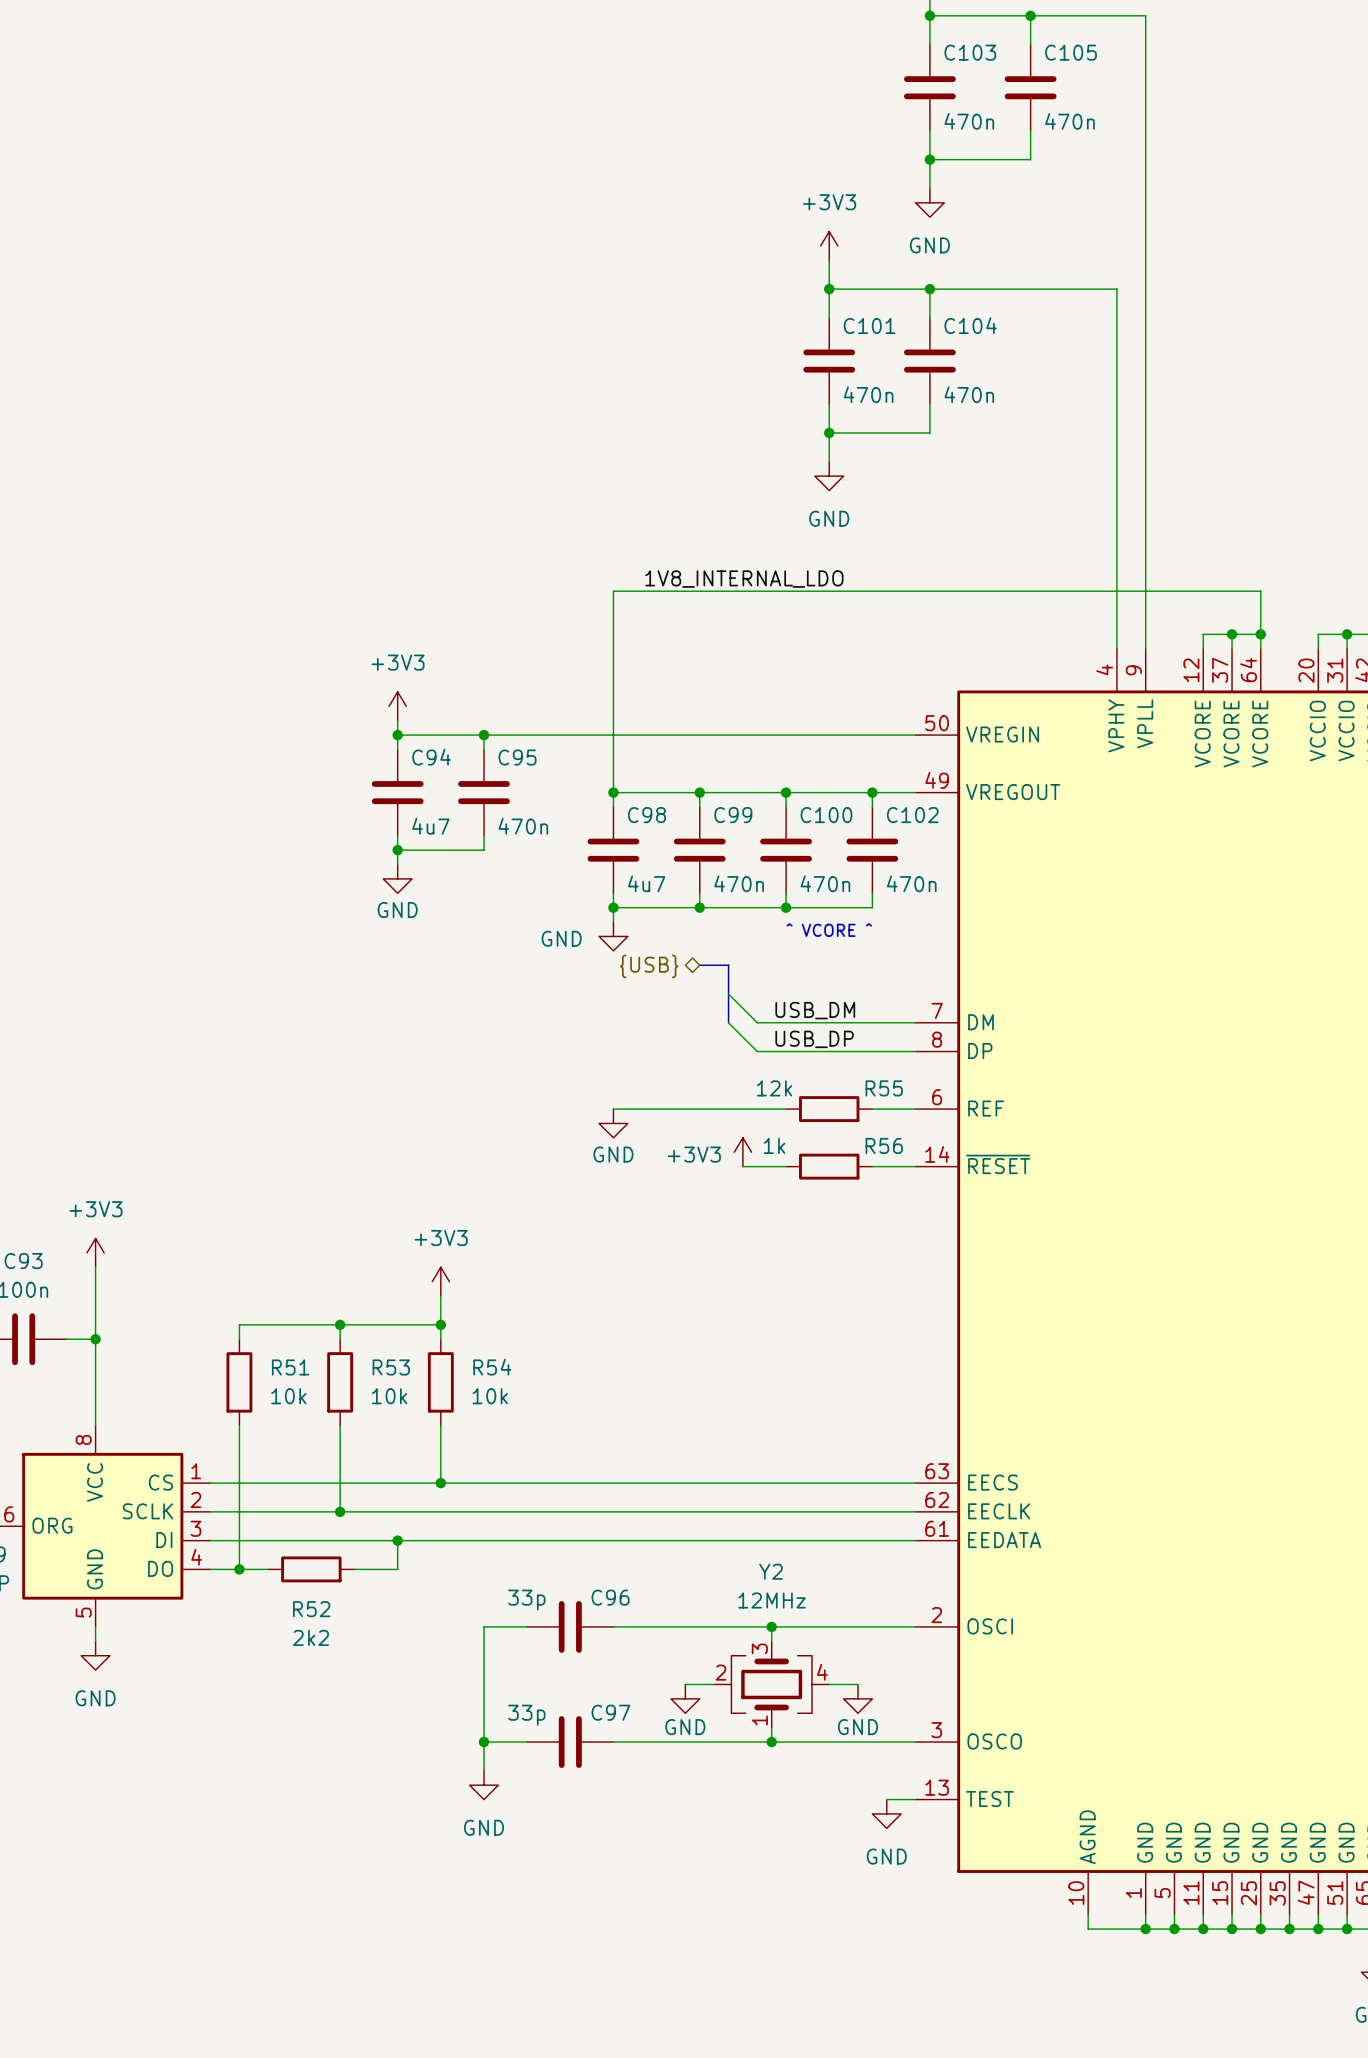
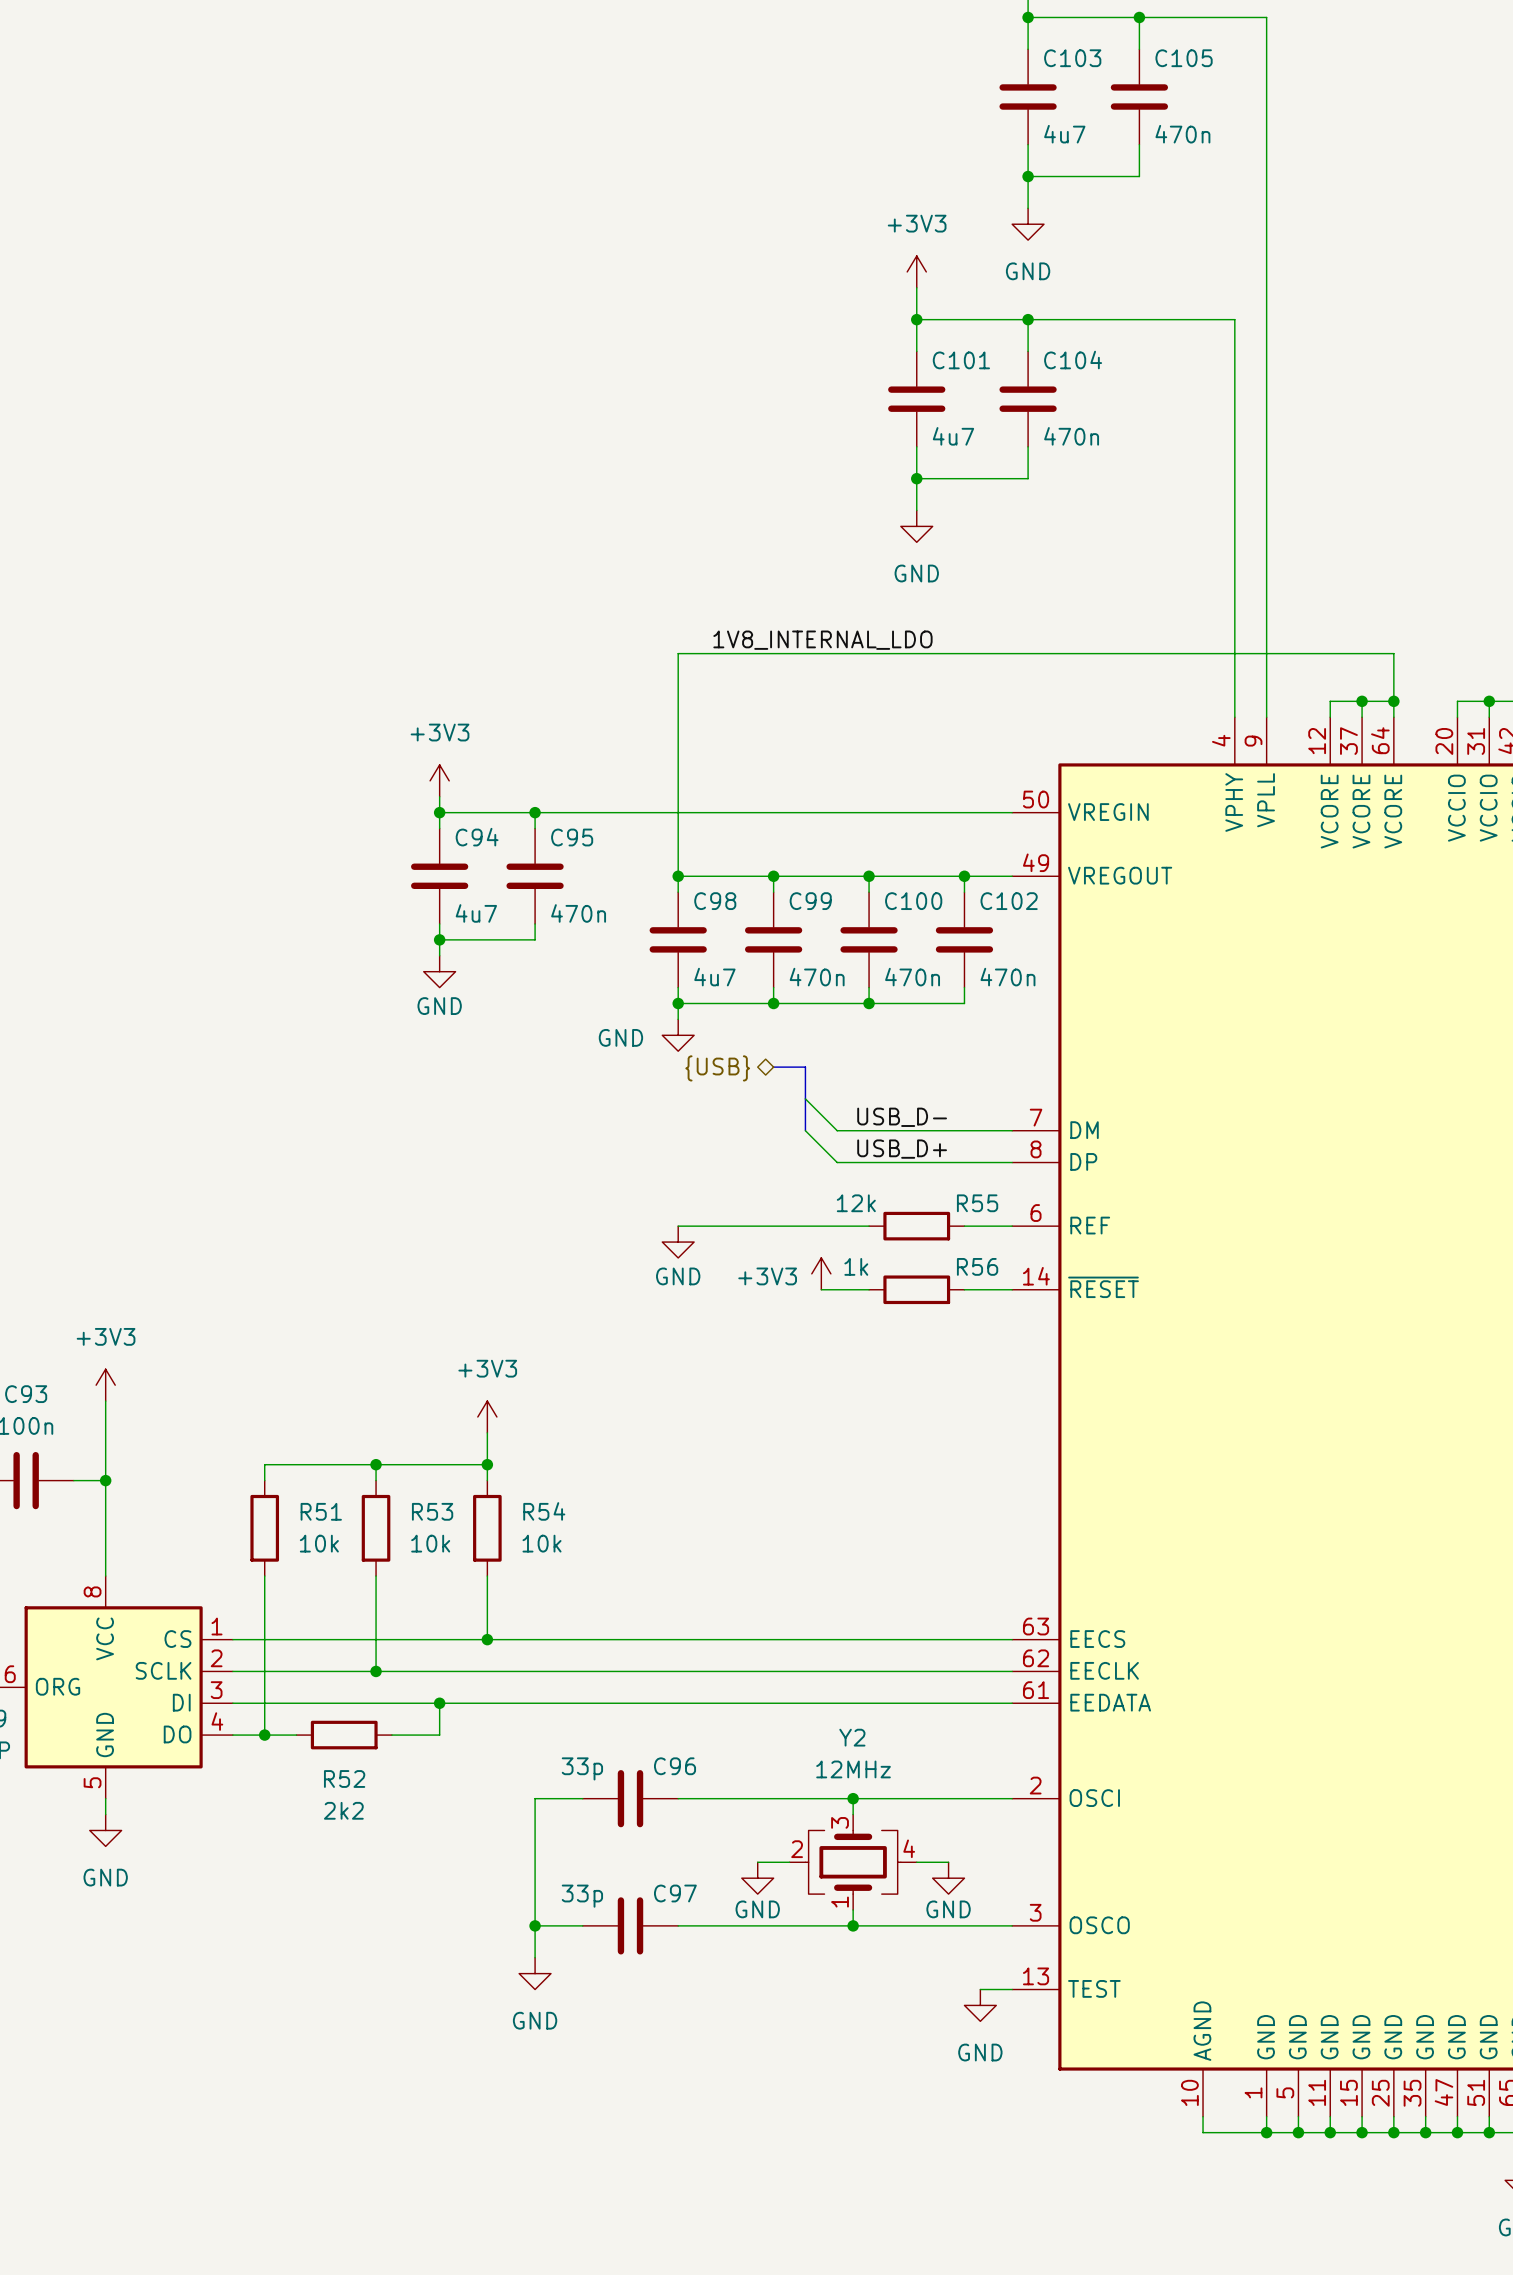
C103 value: 470n (969, 121) -> 4u7 (1064, 134)
C101 value: 470n (868, 394) -> 4u7 (953, 436)
text: ^ VCORE ^ (829, 930) -> none
label: USB_DM (815, 1010) -> USB_D- (902, 1117)
label: USB_DP (814, 1039) -> USB_D+ (902, 1149)

